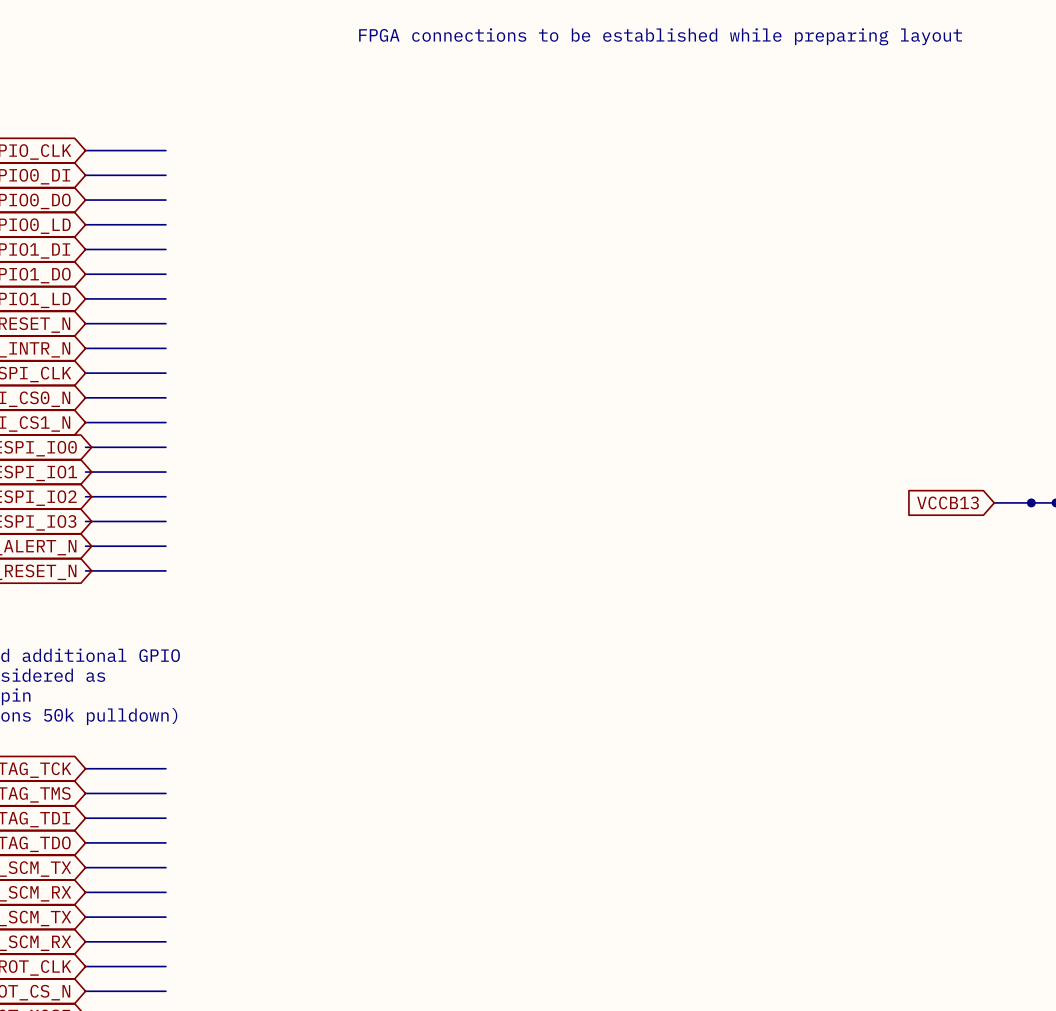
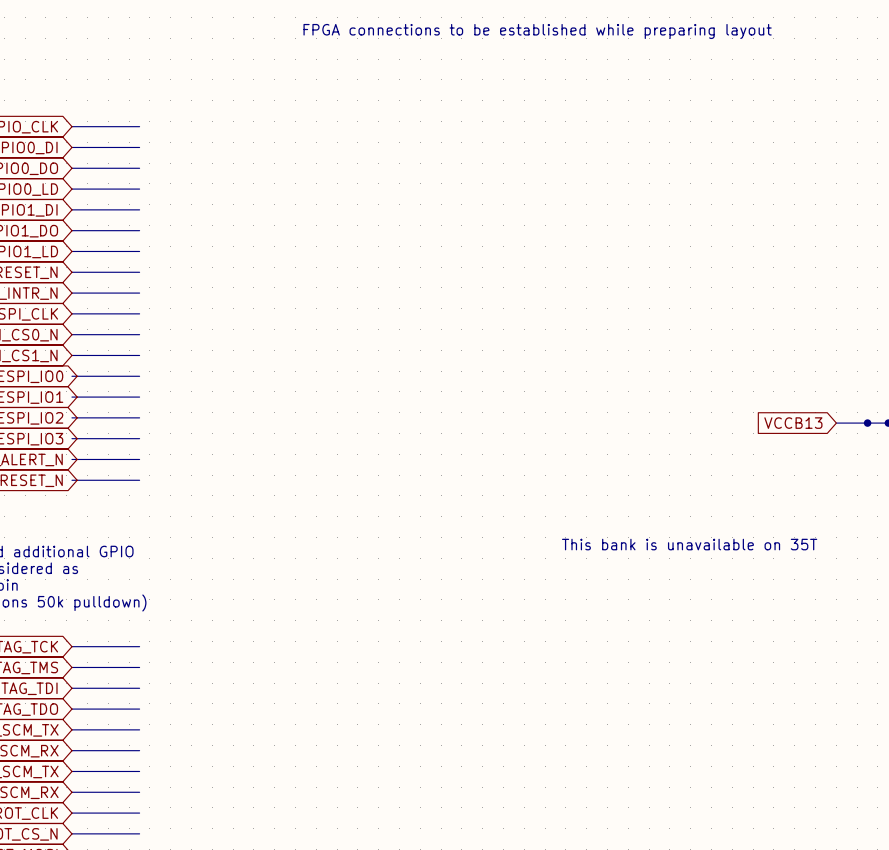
text: none -> This bank is unavailable on 35T (689, 544)

